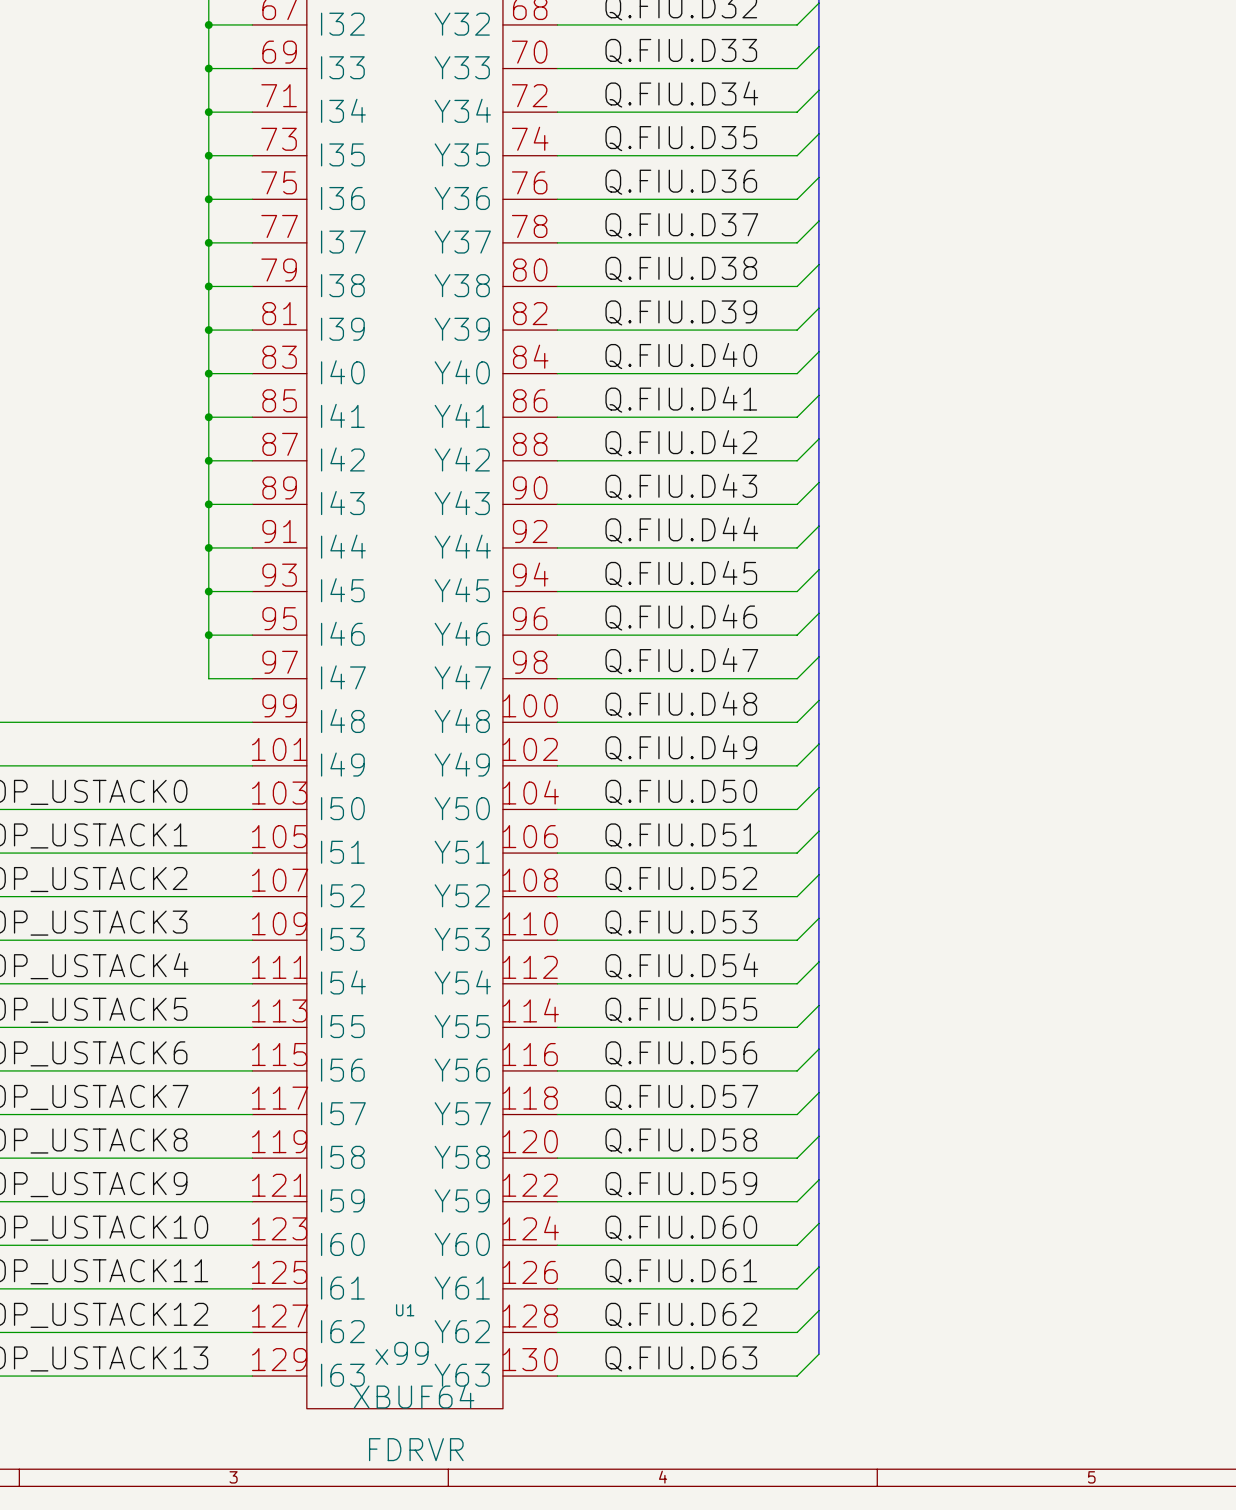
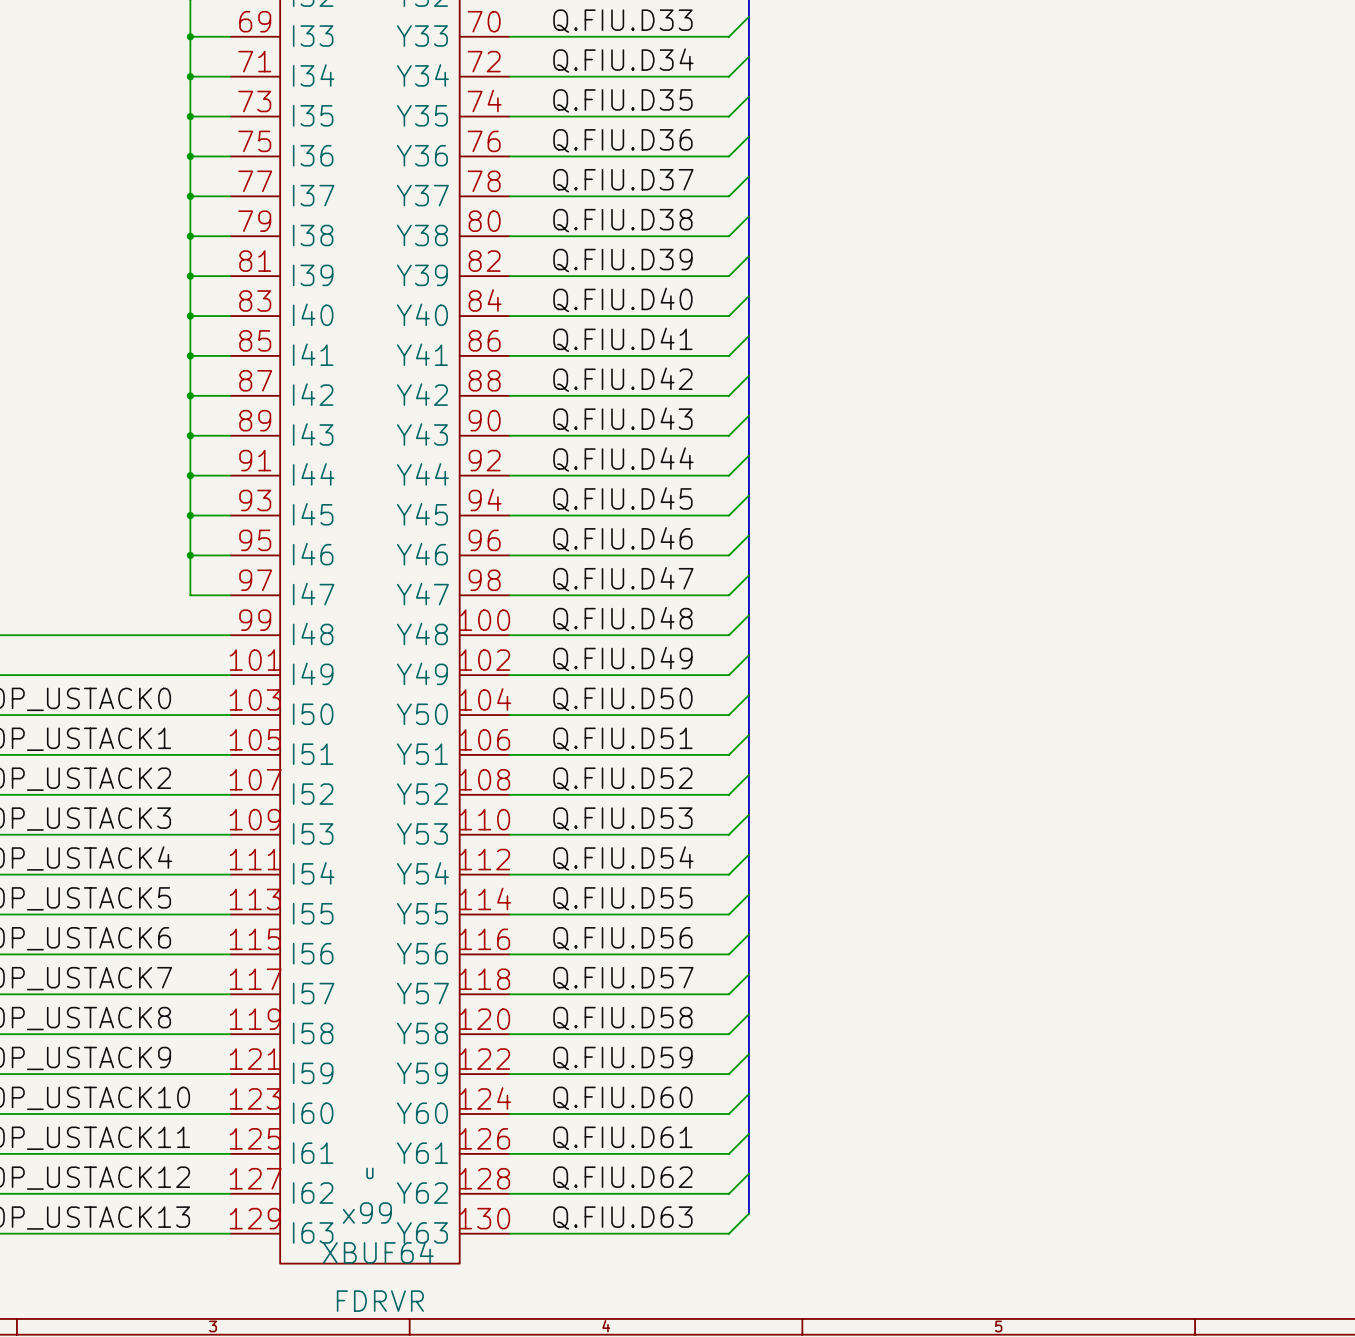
U1 name: U1 (405, 1310) -> U (369, 1173)

